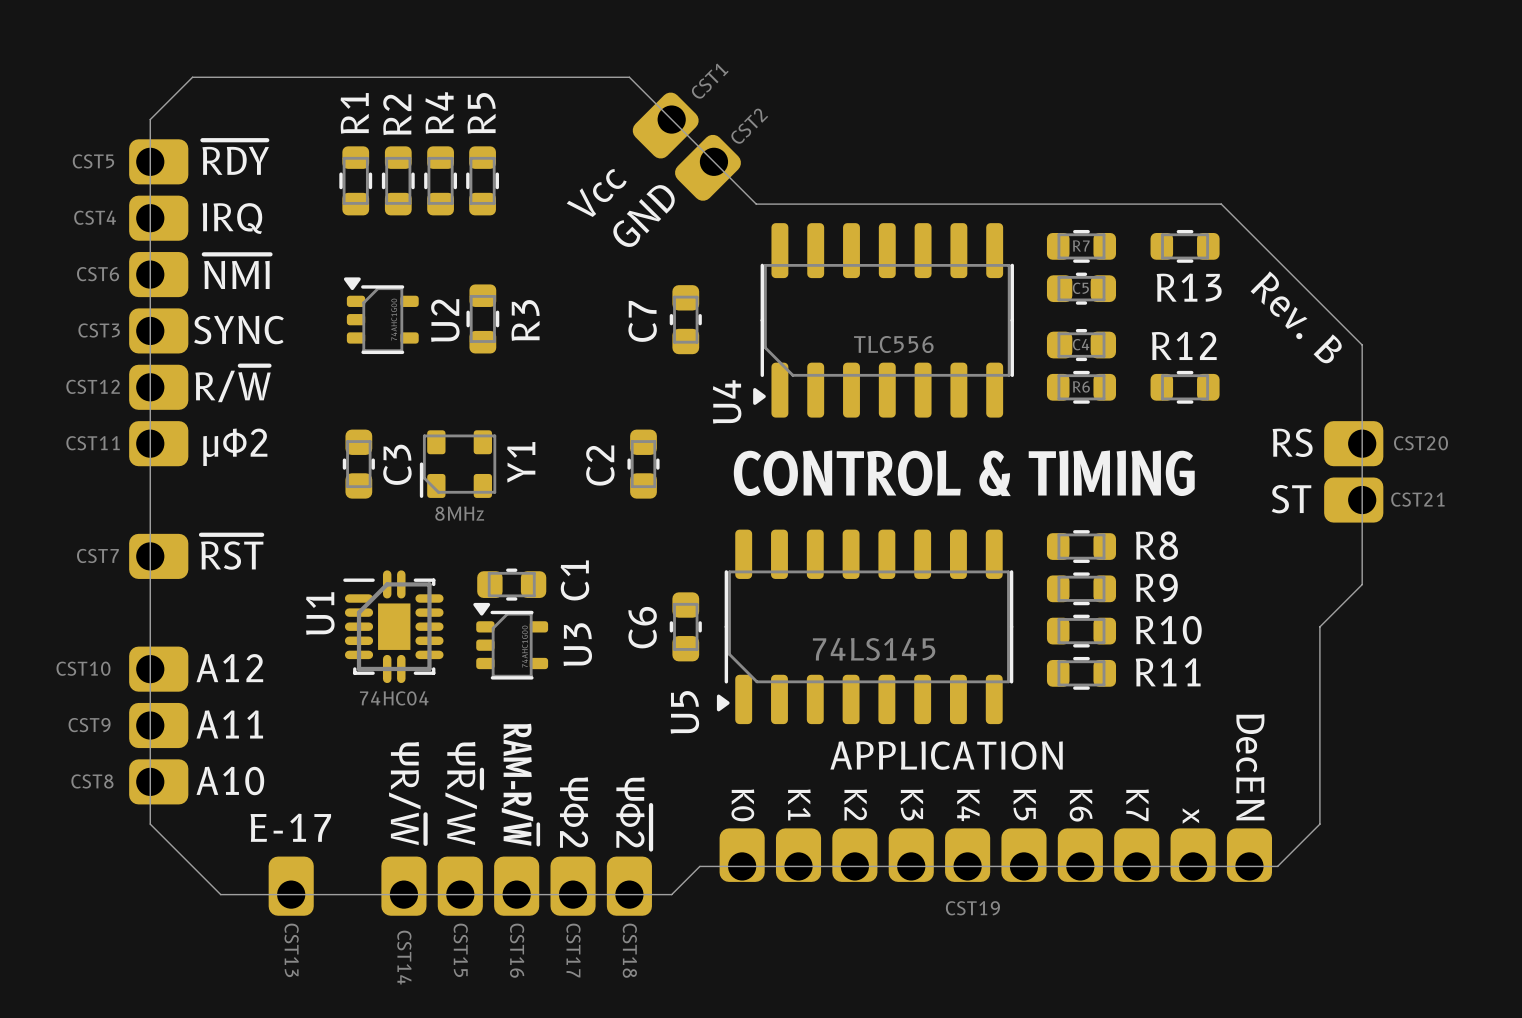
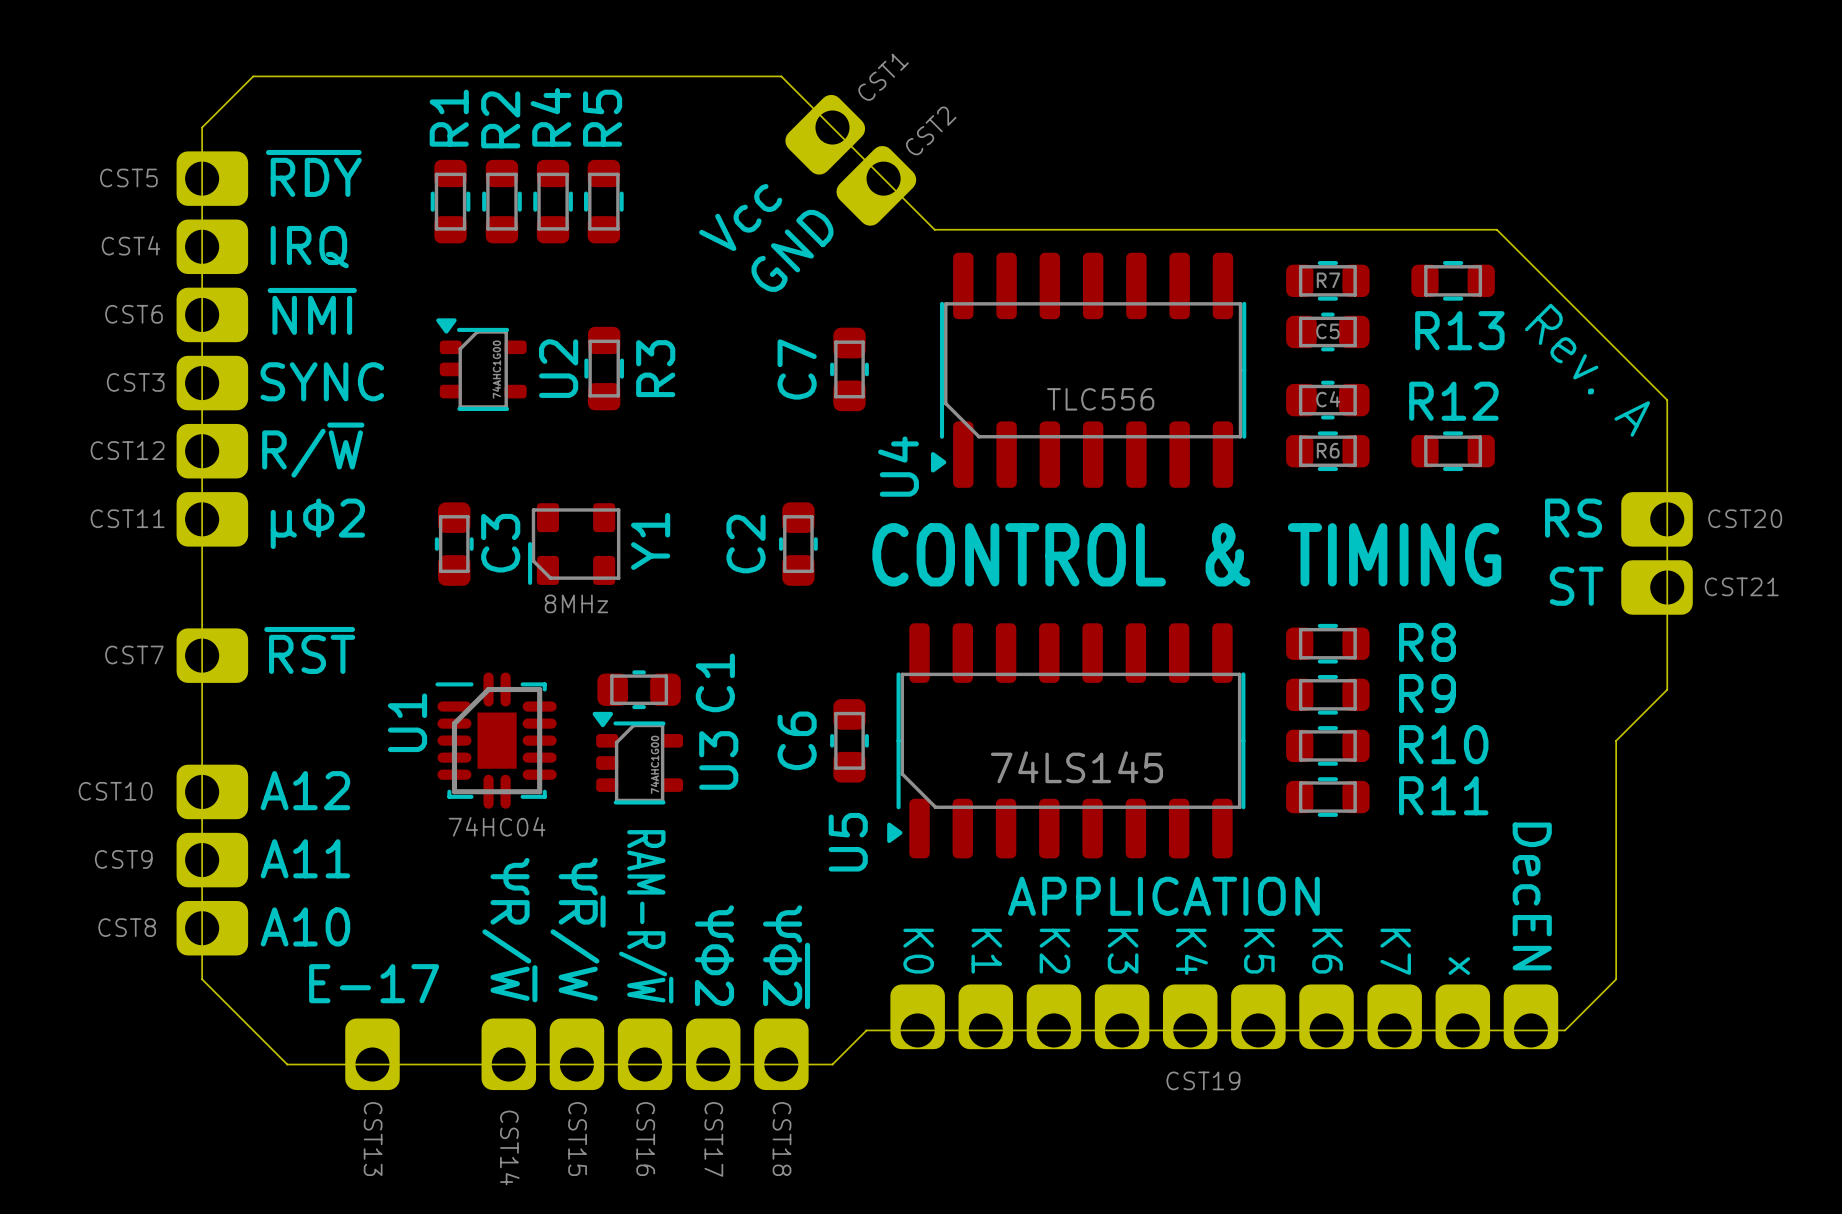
text: Rev. B (1296, 317) -> Rev. A (1587, 370)

